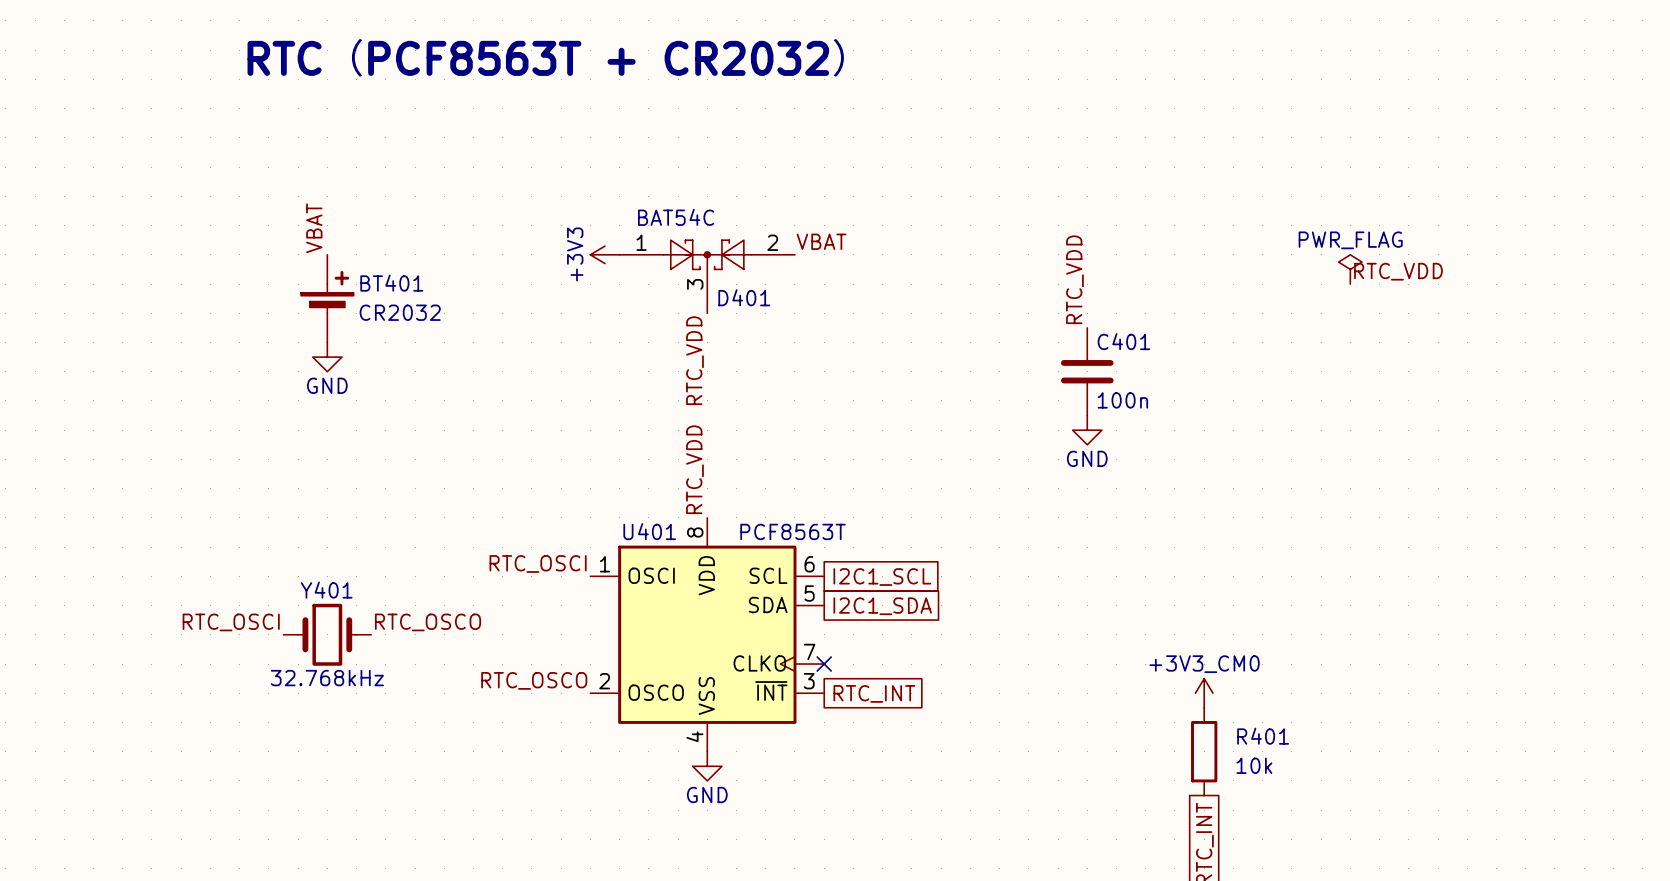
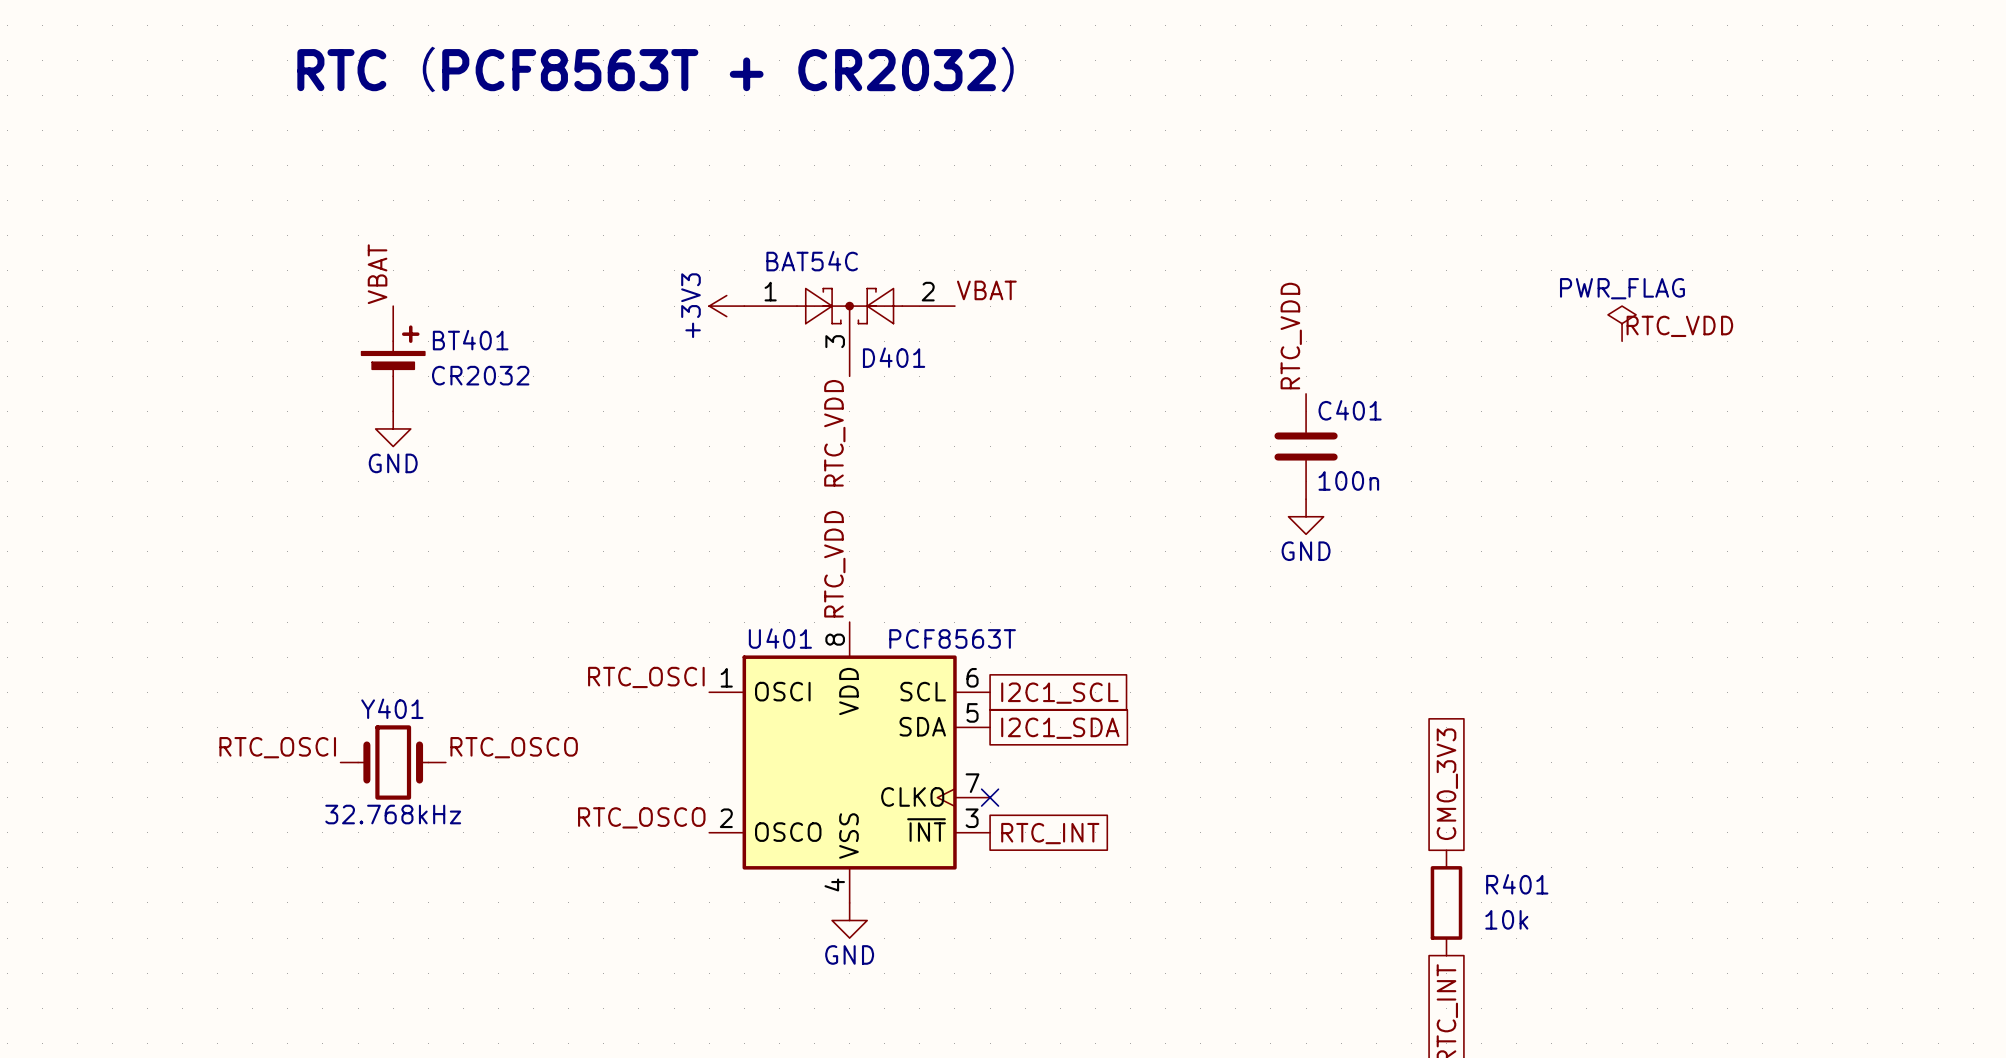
global label: none -> CM0_3V3 (1447, 784)
power symbol: +3V3_CM0 (1204, 693) -> none

